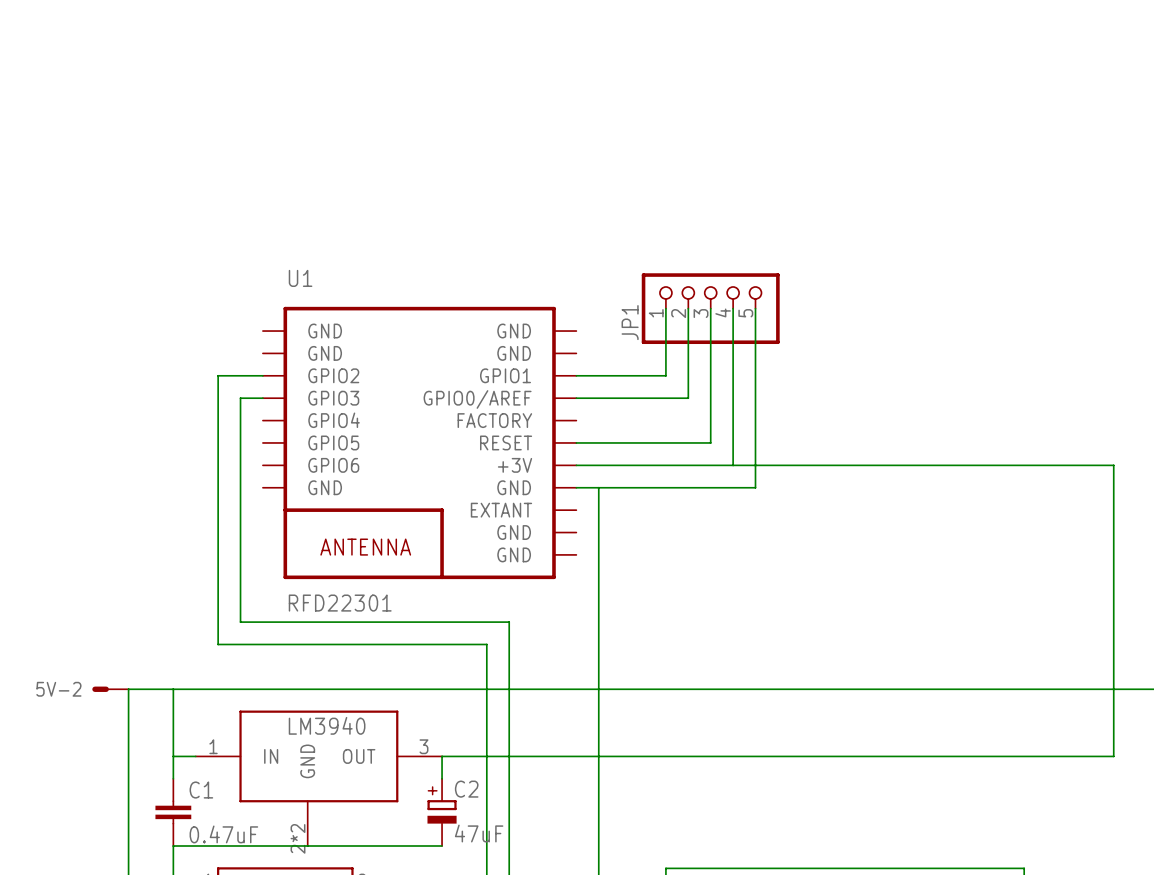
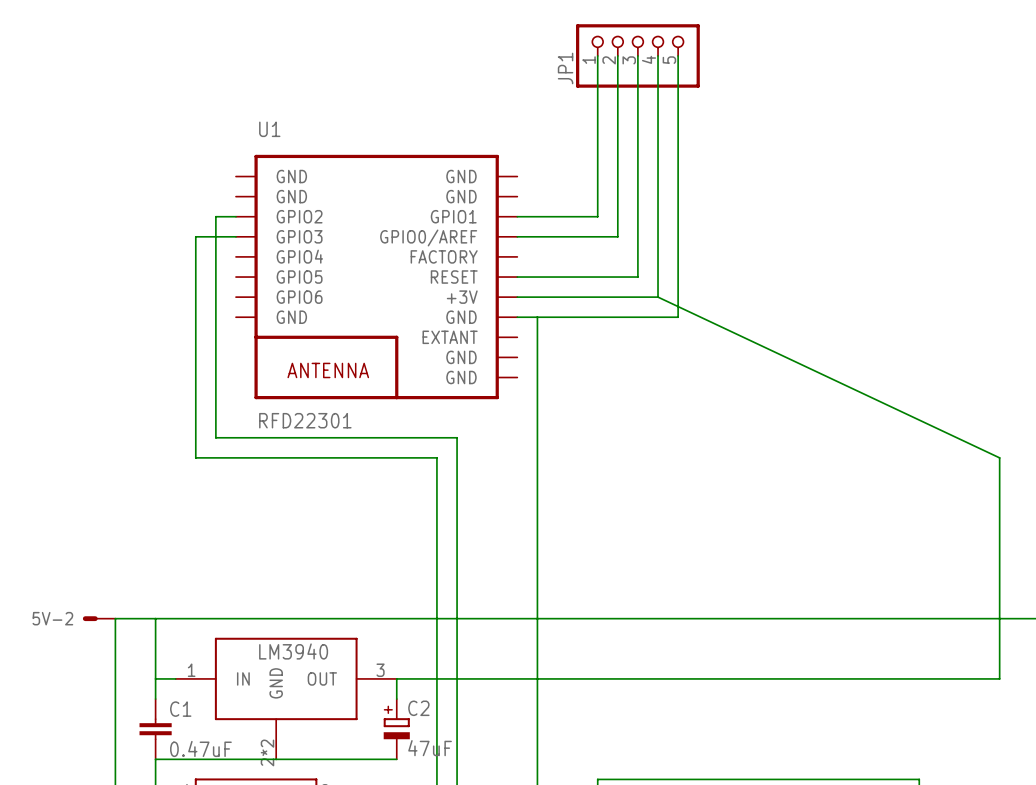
wire: none -> (597, 55) (597, 216) (517, 216)
wire: none -> (617, 55) (617, 236) (517, 236)
wire: none -> (637, 55) (637, 277) (517, 277)
wire: none -> (658, 55) (658, 277)
wire: none -> (678, 55) (678, 277)
wire: (665, 308) (665, 375) (576, 375) -> none
wire: (688, 308) (688, 398) (576, 398) -> none
wire: (710, 308) (710, 442) (576, 442) -> none
JP1 position: (710, 308) -> (637, 55)
wire: (733, 331) (733, 465) -> (537, 317) (537, 437)
wire: (755, 353) (755, 487) (576, 487) -> (678, 317) (517, 317)
wire: (218, 375) (262, 375) -> (195, 337) (195, 236) (235, 236)
wire: (240, 398) (262, 398) -> (215, 357) (215, 216) (235, 216)
U1 position: (419, 442) -> (376, 277)
wire: (576, 465) (1113, 465) (1113, 510) -> (517, 297) (658, 297) (999, 457)
wire: (240, 487) (240, 622) (509, 622) -> (215, 437) (457, 437) (457, 558)
wire: (218, 510) (218, 644) (486, 644) -> (195, 457) (436, 457) (436, 578)

